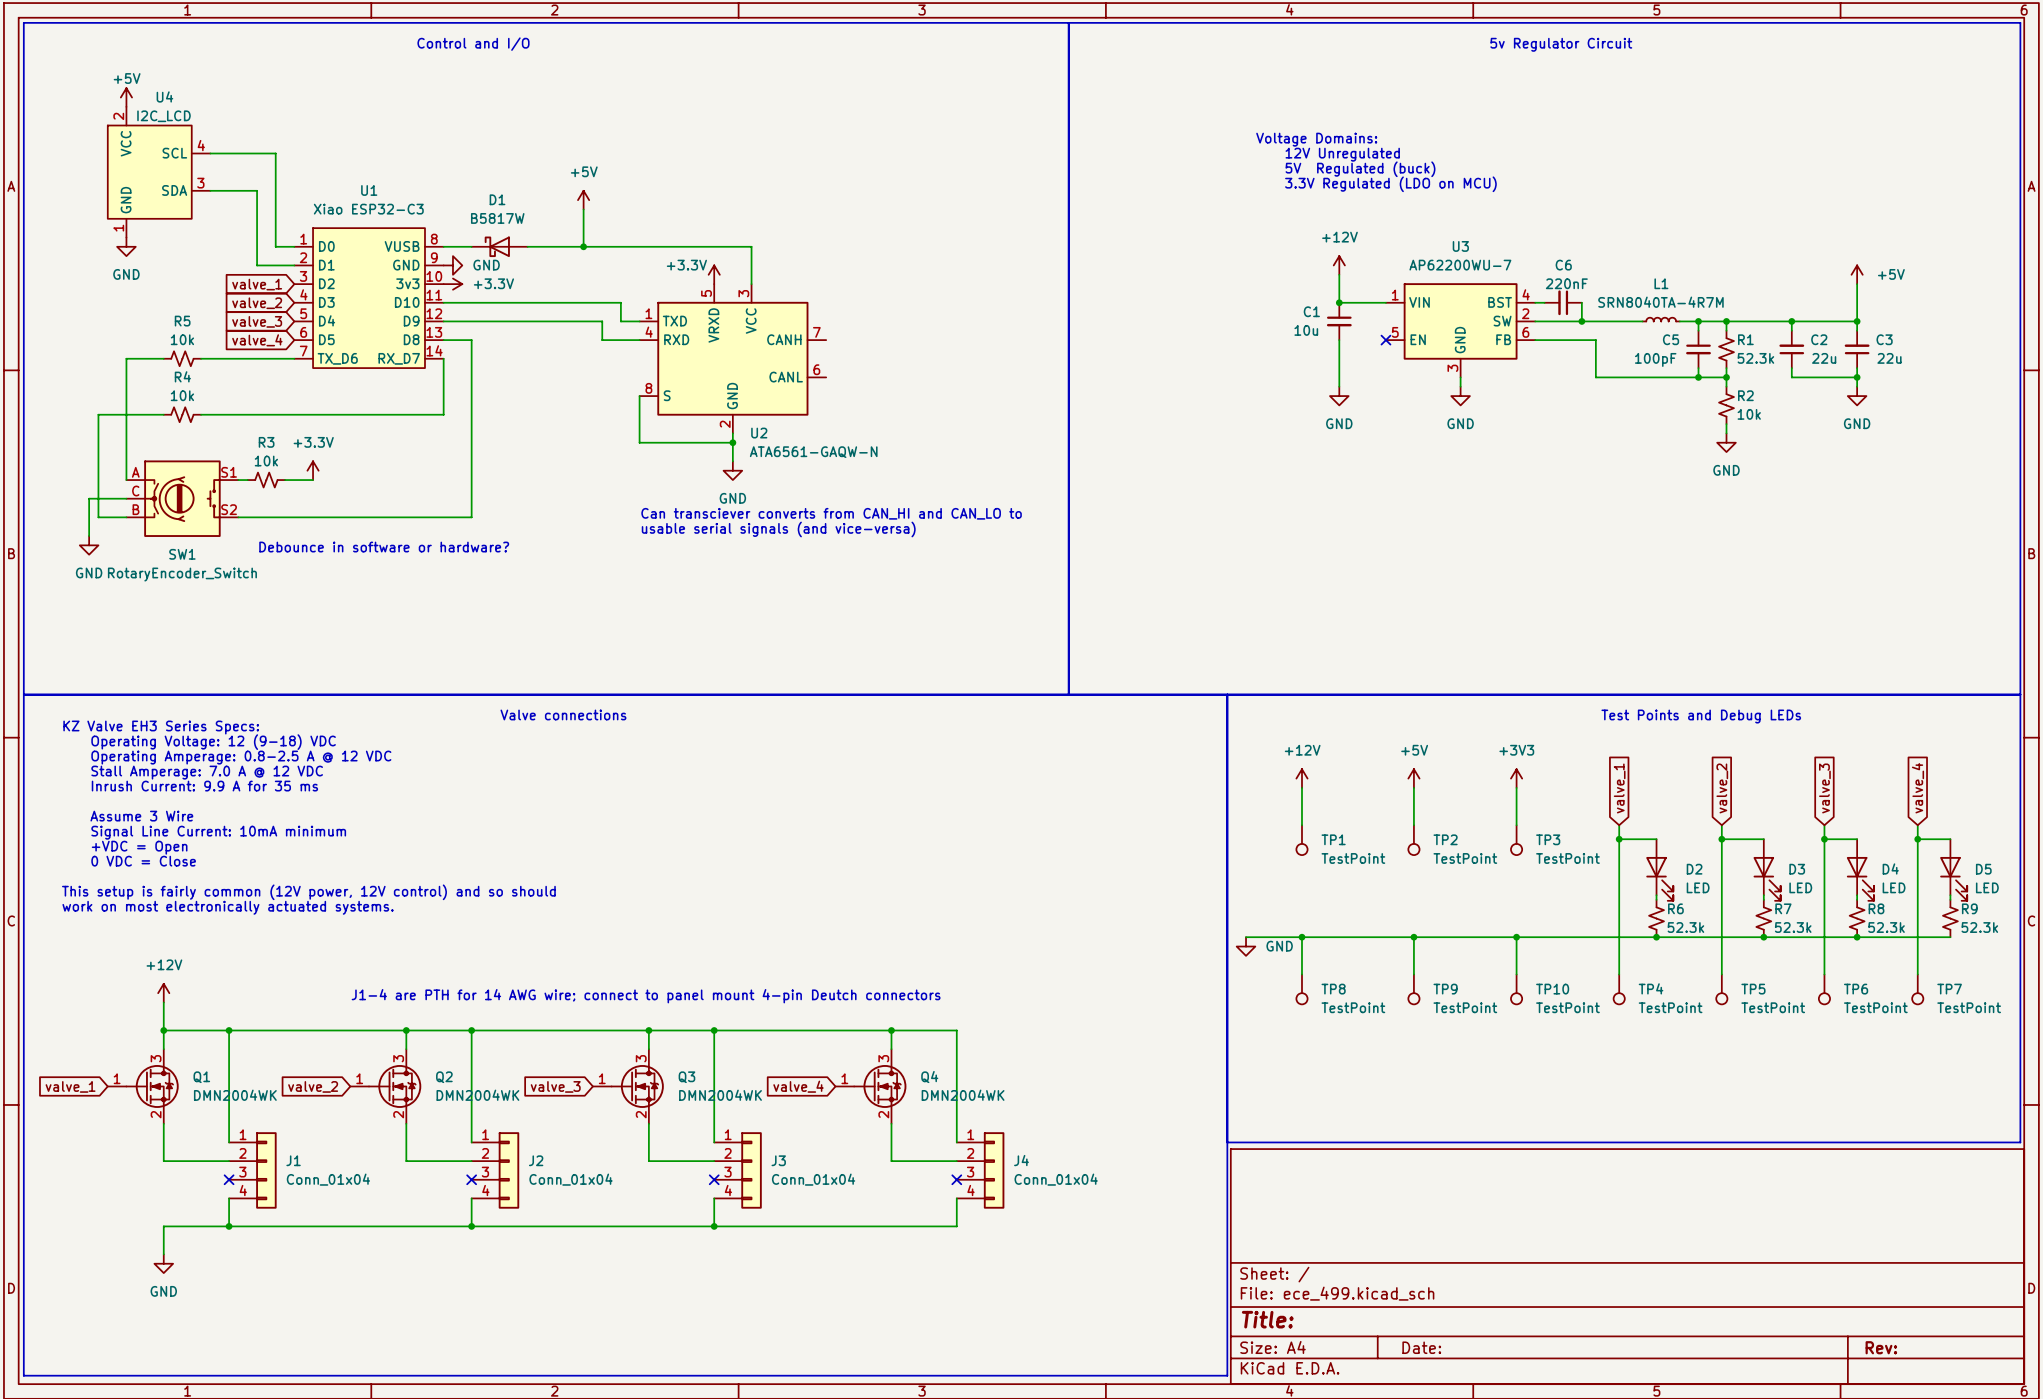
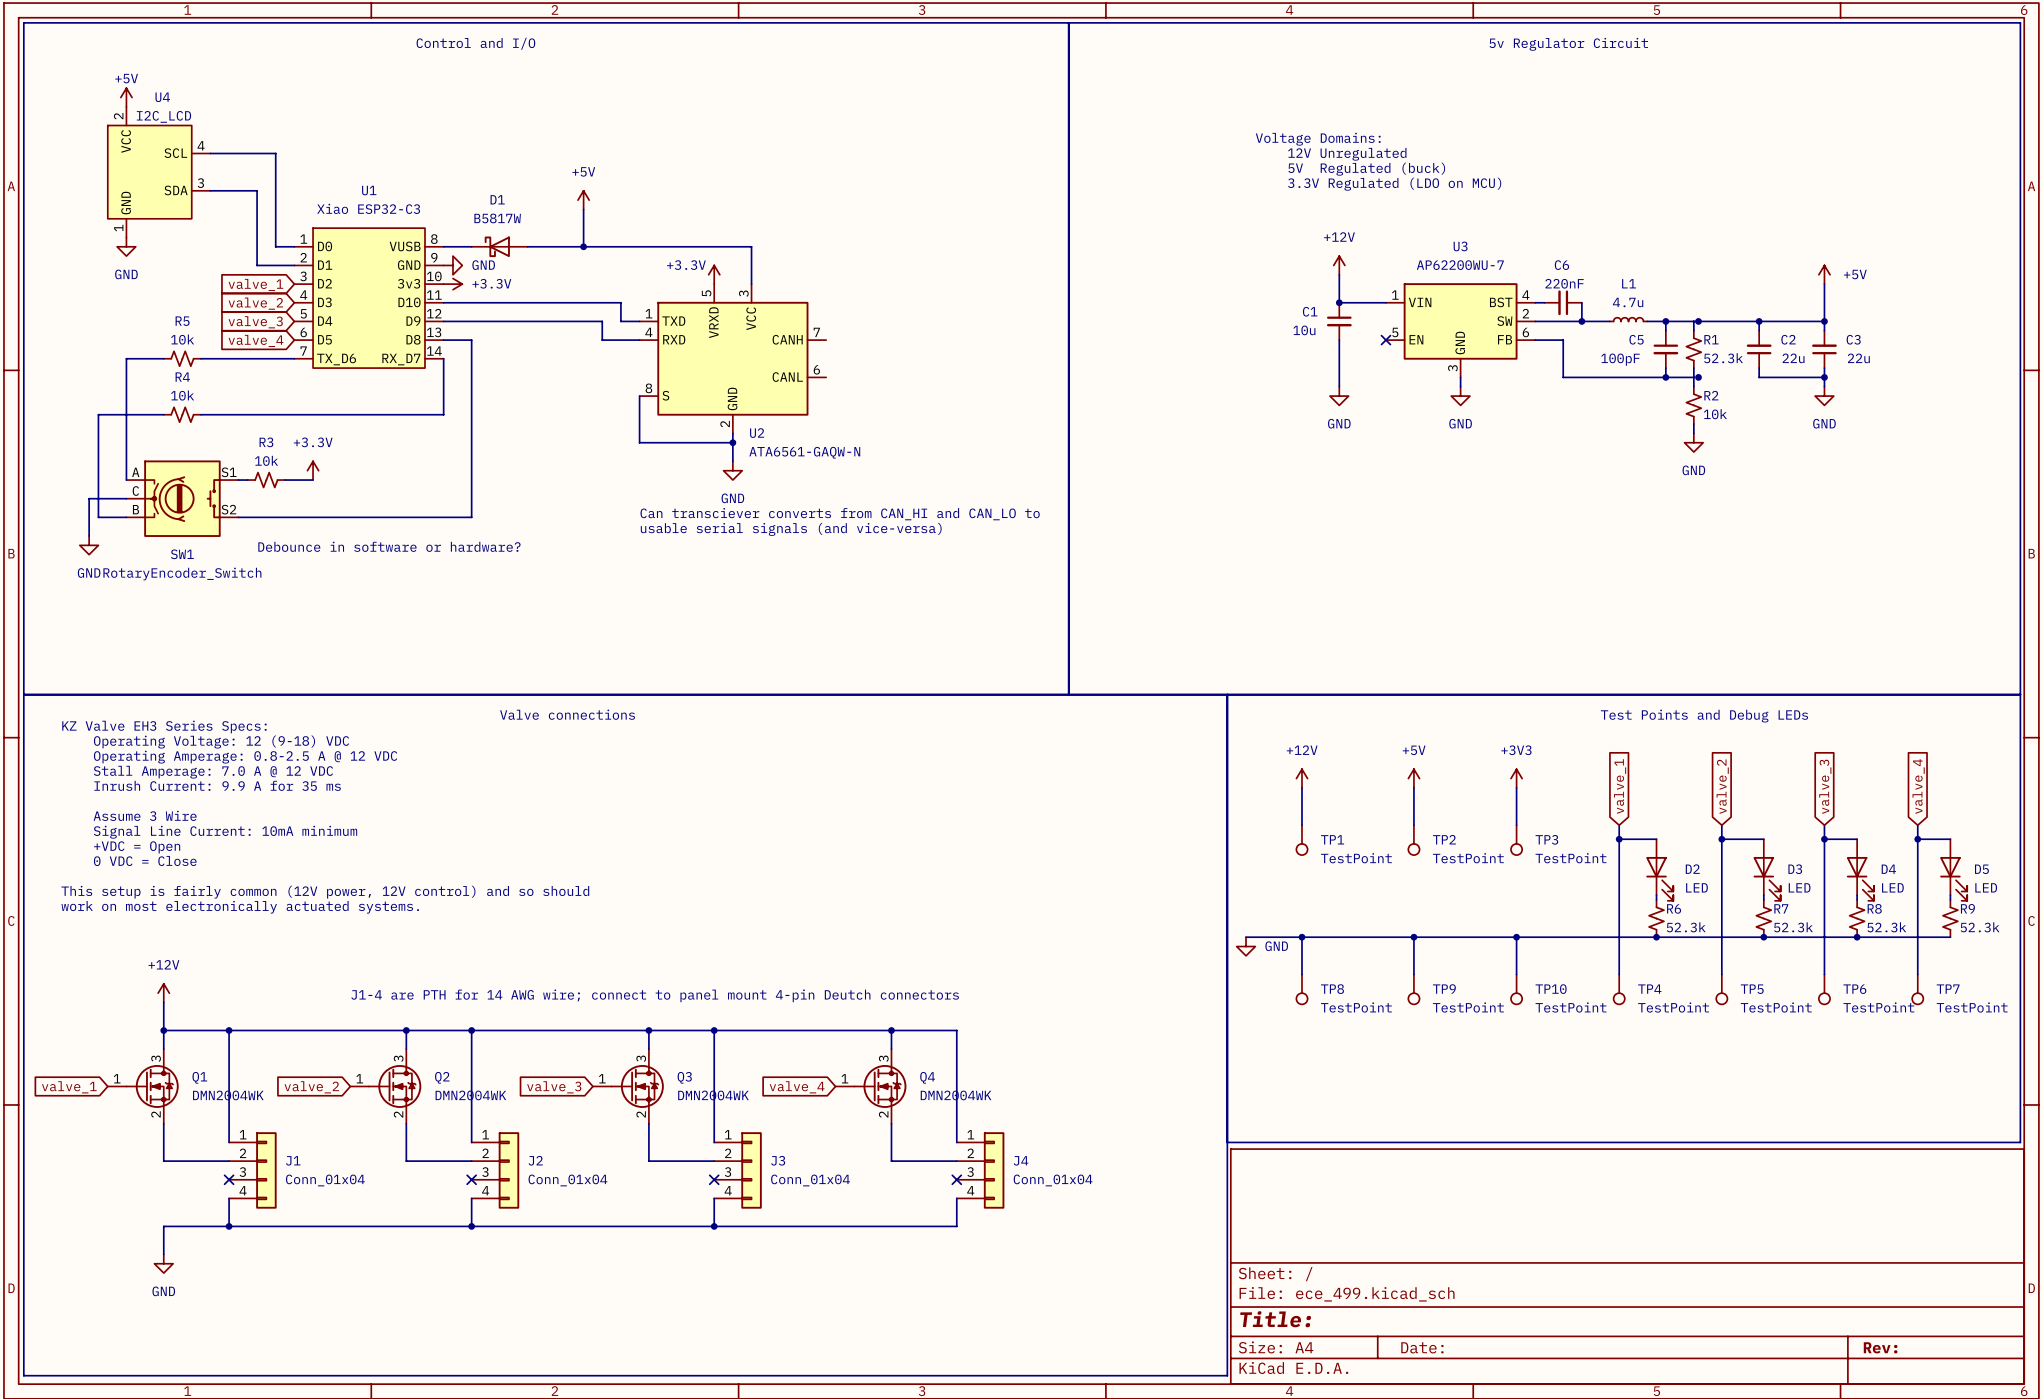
power symbol position: +5V (1857, 274) -> +5V (1824, 274)
wire: (1857, 284) (1857, 330) -> (1824, 284) (1824, 330)
L1 value: SRN8040TA-4R7M (1660, 302) -> 4.7u (1628, 302)
L1 position: (1661, 319) -> (1628, 319)
wire: (1609, 321) (1642, 321) -> (1647, 321) (1679, 321)
junction: none -> (1665, 321)
wire: (1698, 321) (1698, 330) -> (1665, 321) (1665, 330)
wire: (1726, 321) (1726, 330) -> (1693, 321) (1693, 330)
junction: (1726, 321) -> none
junction: none -> (1759, 321)
wire: (1791, 321) (1791, 330) -> (1759, 321) (1759, 330)
junction: (1791, 321) -> none
wire: (1824, 321) (1857, 321) -> none
junction: none -> (1824, 321)
junction: (1857, 321) -> none
wire: (1563, 340) (1595, 340) (1595, 377) -> (1563, 340) (1563, 377) (1595, 377)
C5 position: (1698, 349) -> (1665, 349)
R1 position: (1726, 349) -> (1693, 349)
C2 position: (1791, 349) -> (1759, 349)
C3 position: (1857, 349) -> (1824, 349)
wire: (1698, 368) (1698, 377) -> (1665, 368) (1665, 377)
wire: (1726, 368) (1726, 386) -> (1693, 368) (1693, 386)
wire: (1791, 368) (1791, 377) -> (1759, 368) (1759, 377) (1791, 377)
wire: (1857, 368) (1857, 386) -> (1824, 368) (1824, 386)
junction: none -> (1665, 377)
wire: (1693, 377) (1726, 377) -> none
junction: (1726, 377) -> none
wire: (1824, 377) (1857, 377) -> none
junction: none -> (1824, 377)
junction: (1857, 377) -> none
power symbol position: GND (1857, 396) -> GND (1824, 396)
R2 position: (1726, 405) -> (1693, 405)
wire: (1726, 424) (1726, 433) -> (1693, 424) (1693, 433)
power symbol position: GND (1726, 442) -> GND (1693, 442)

